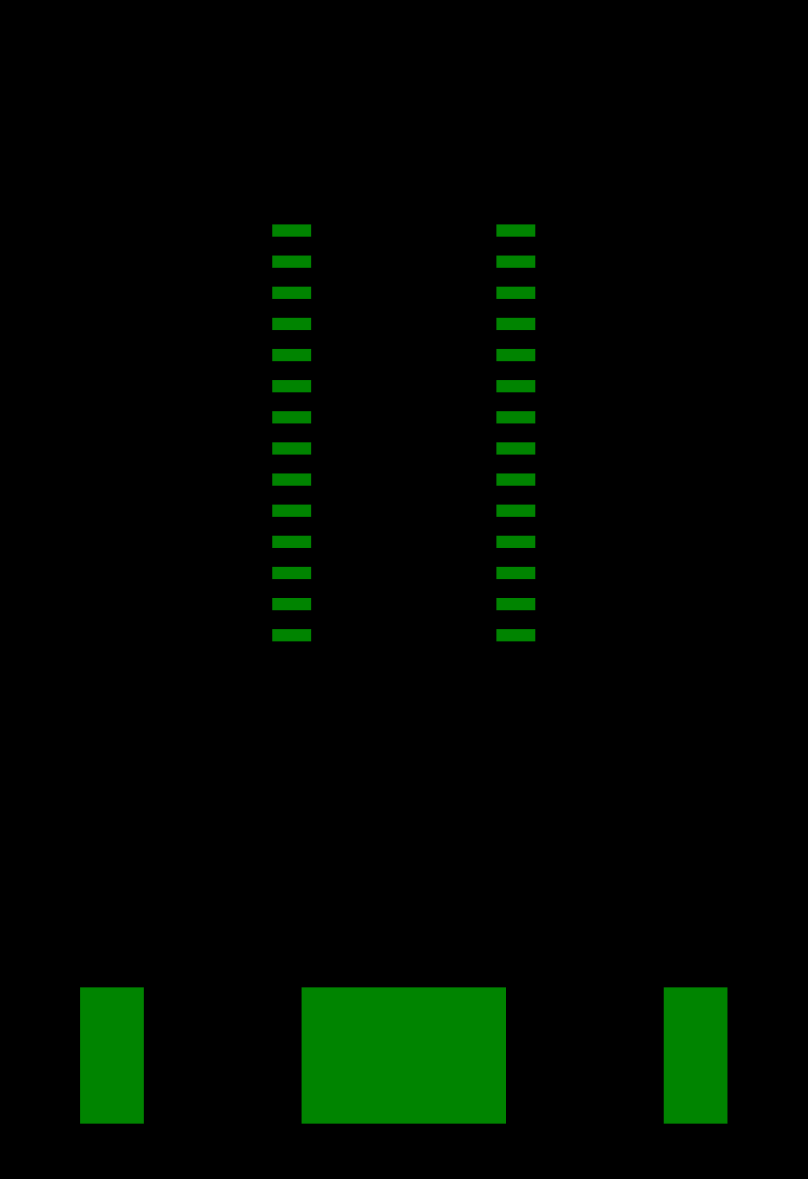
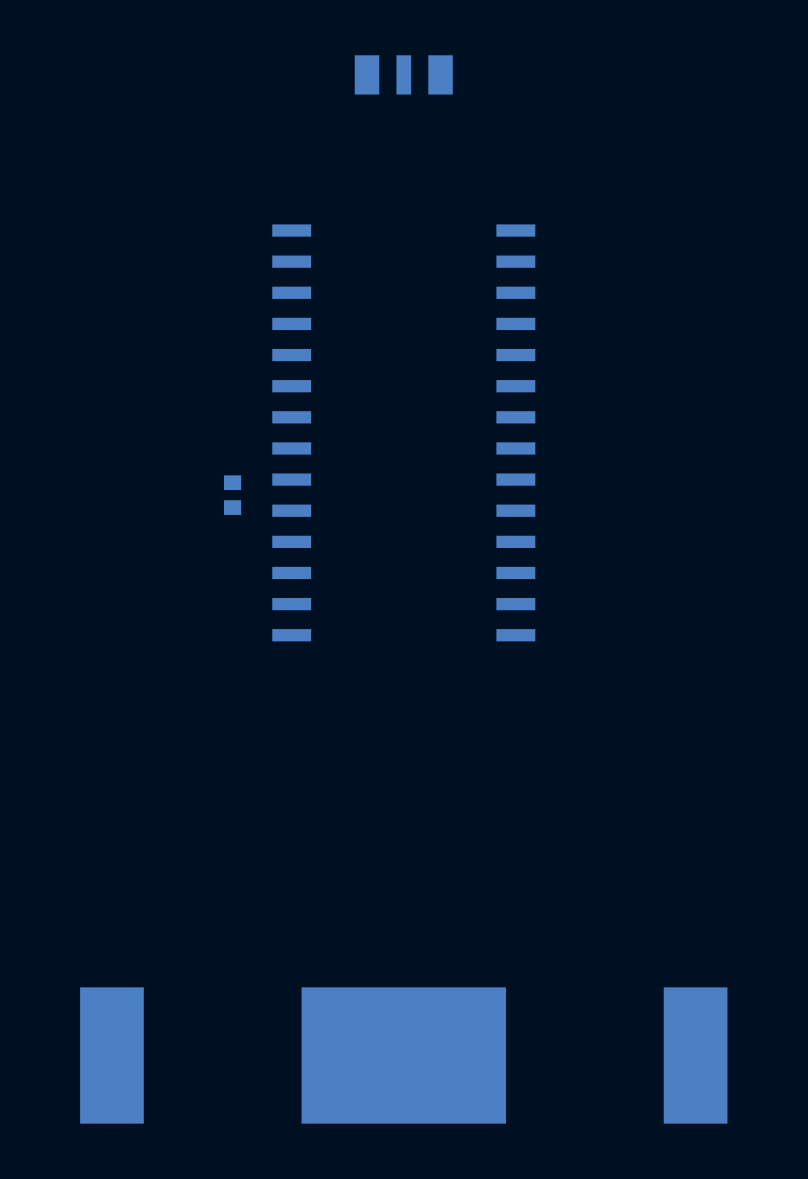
part: none -> (403, 74)
part: none -> (232, 495)

